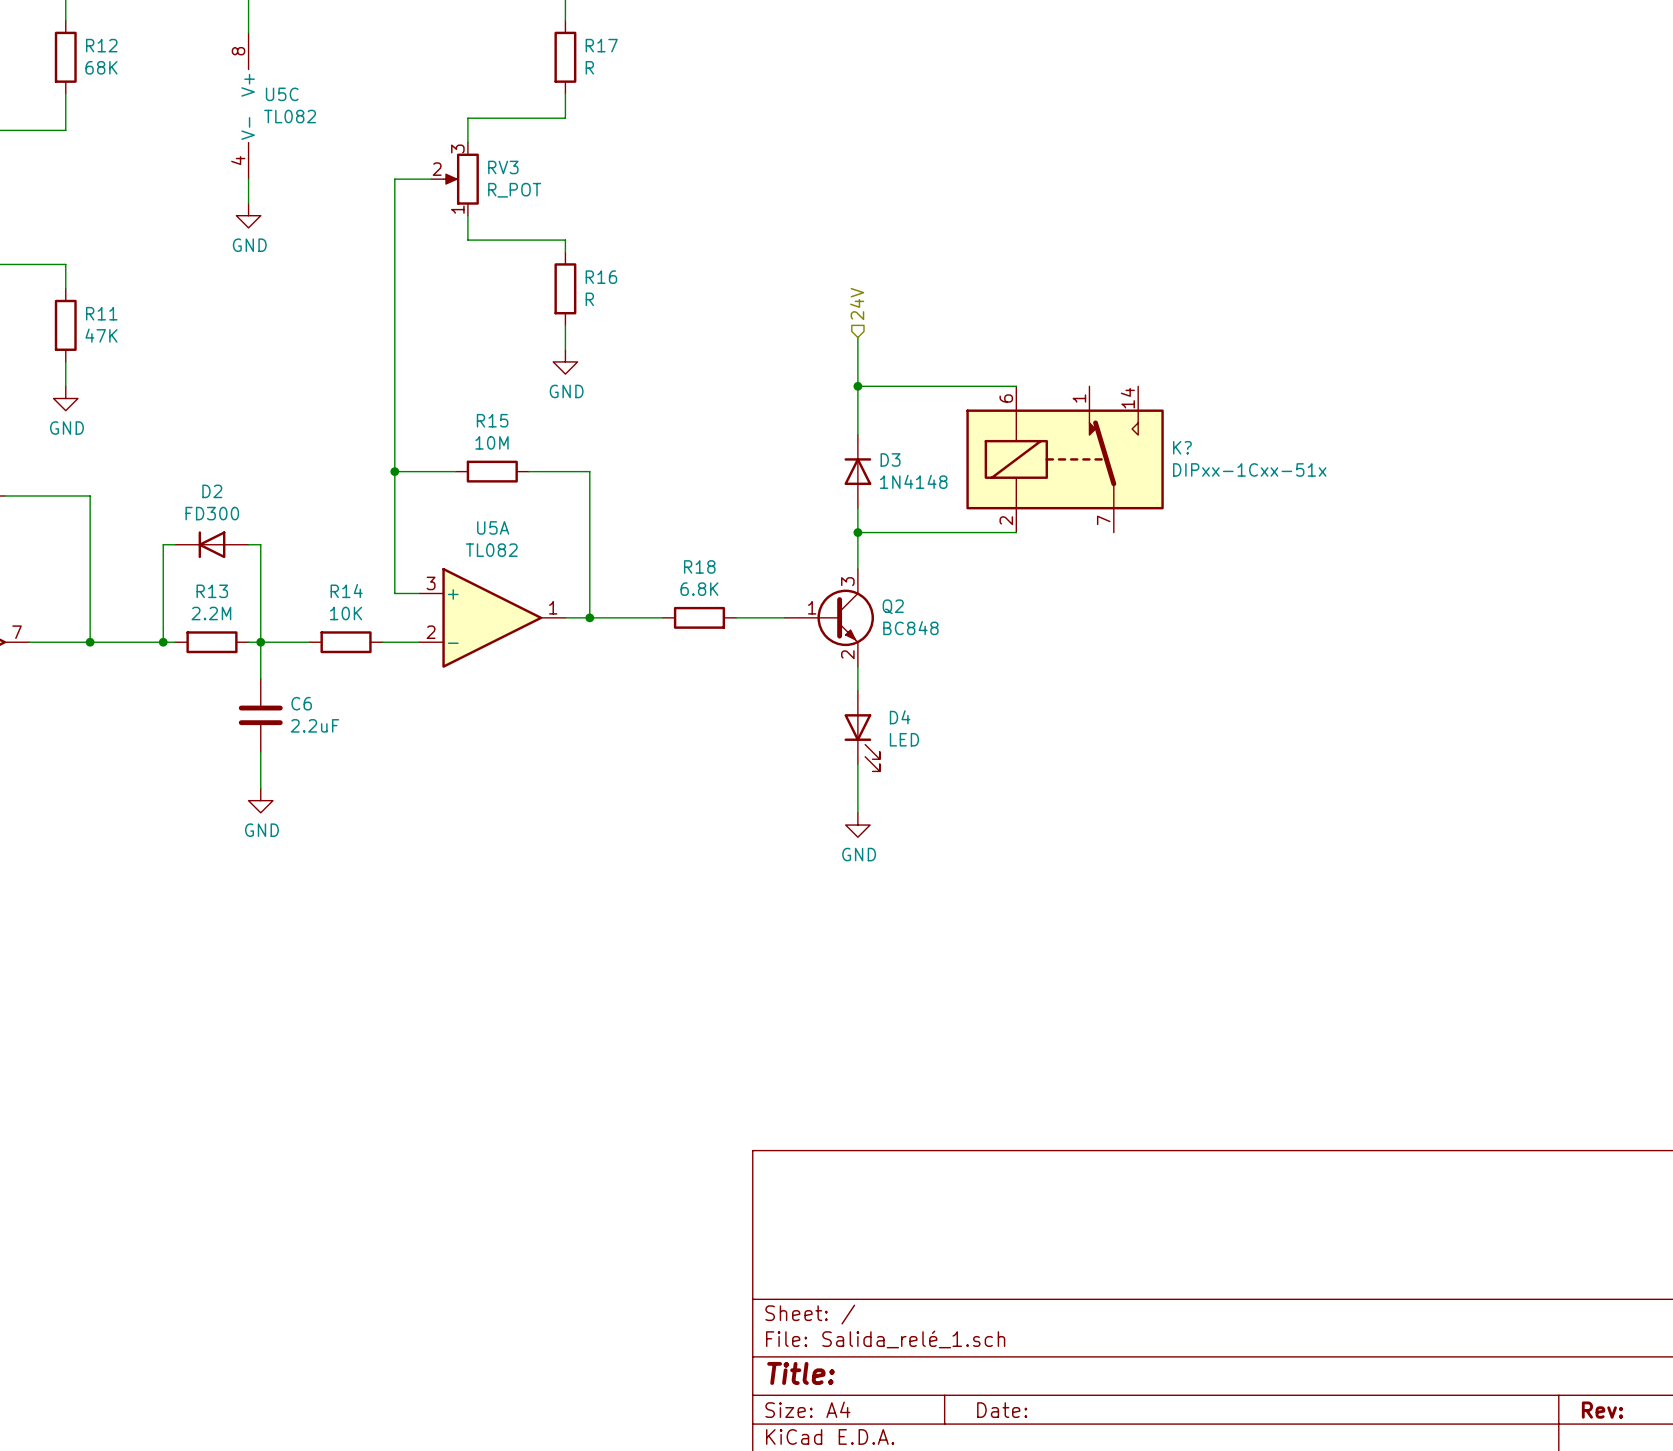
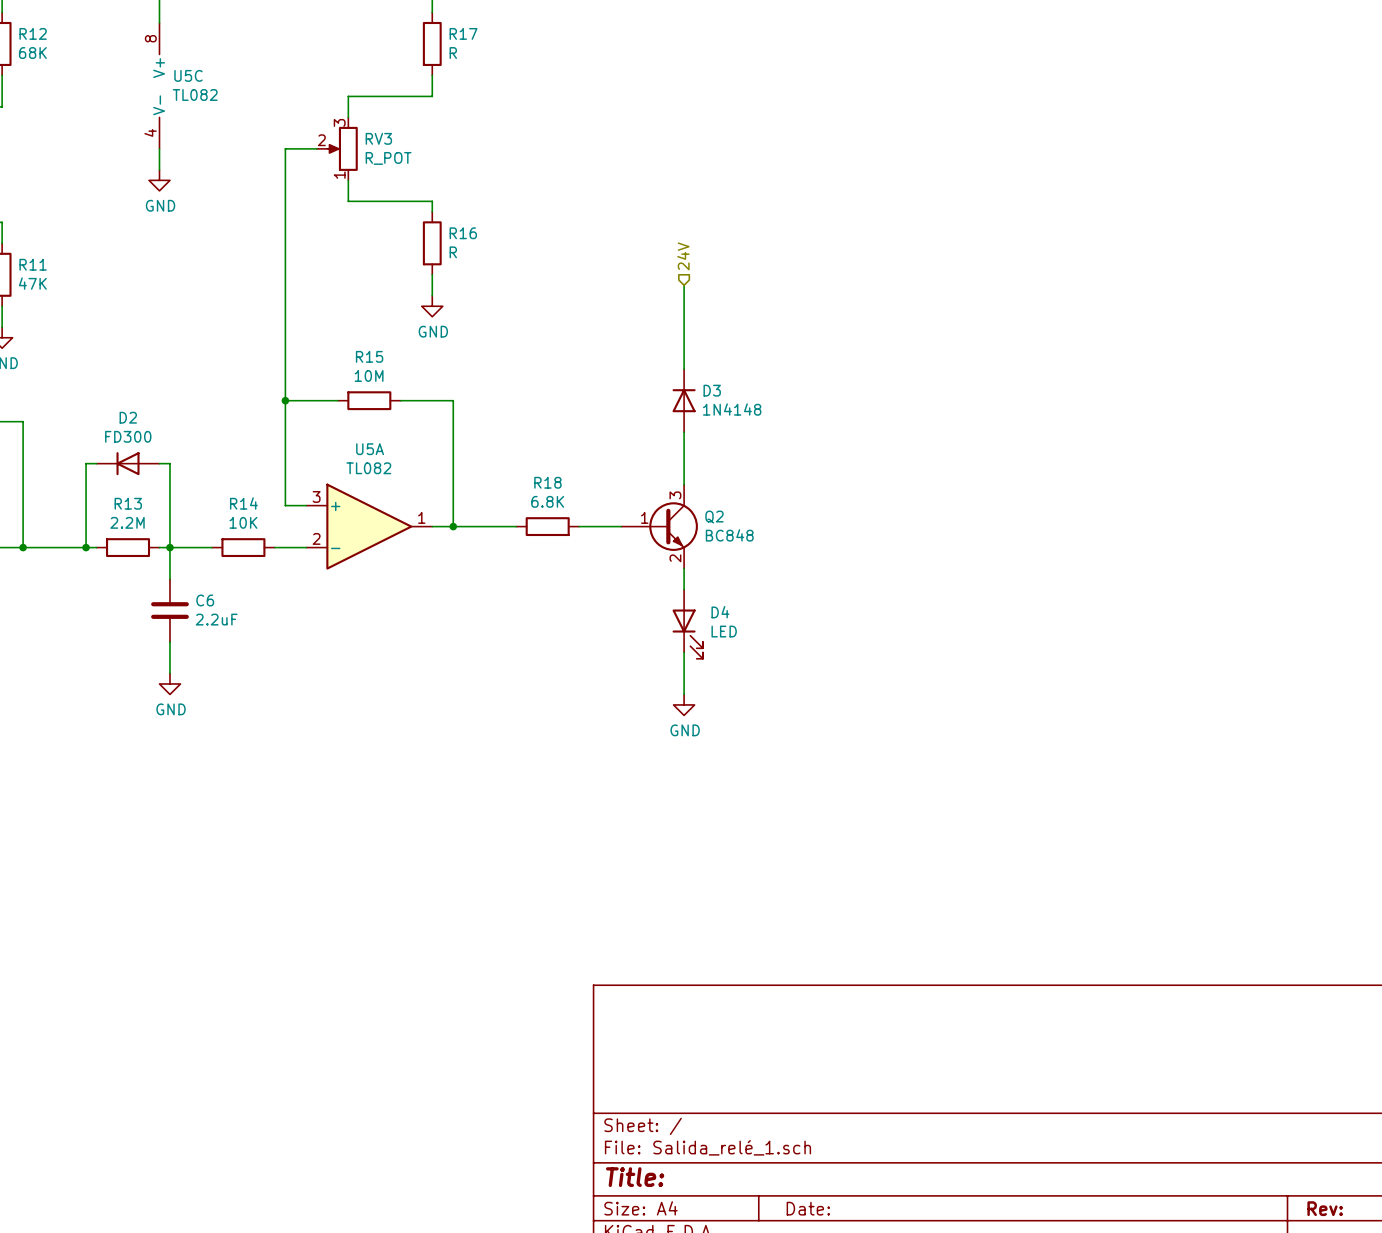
wire: (857, 386) (1016, 386) -> none
junction: (857, 386) -> none
K?: DIPxx-1Cxx-51x (1065, 459) -> none
wire: (857, 532) (1016, 532) -> none
junction: (857, 532) -> none

